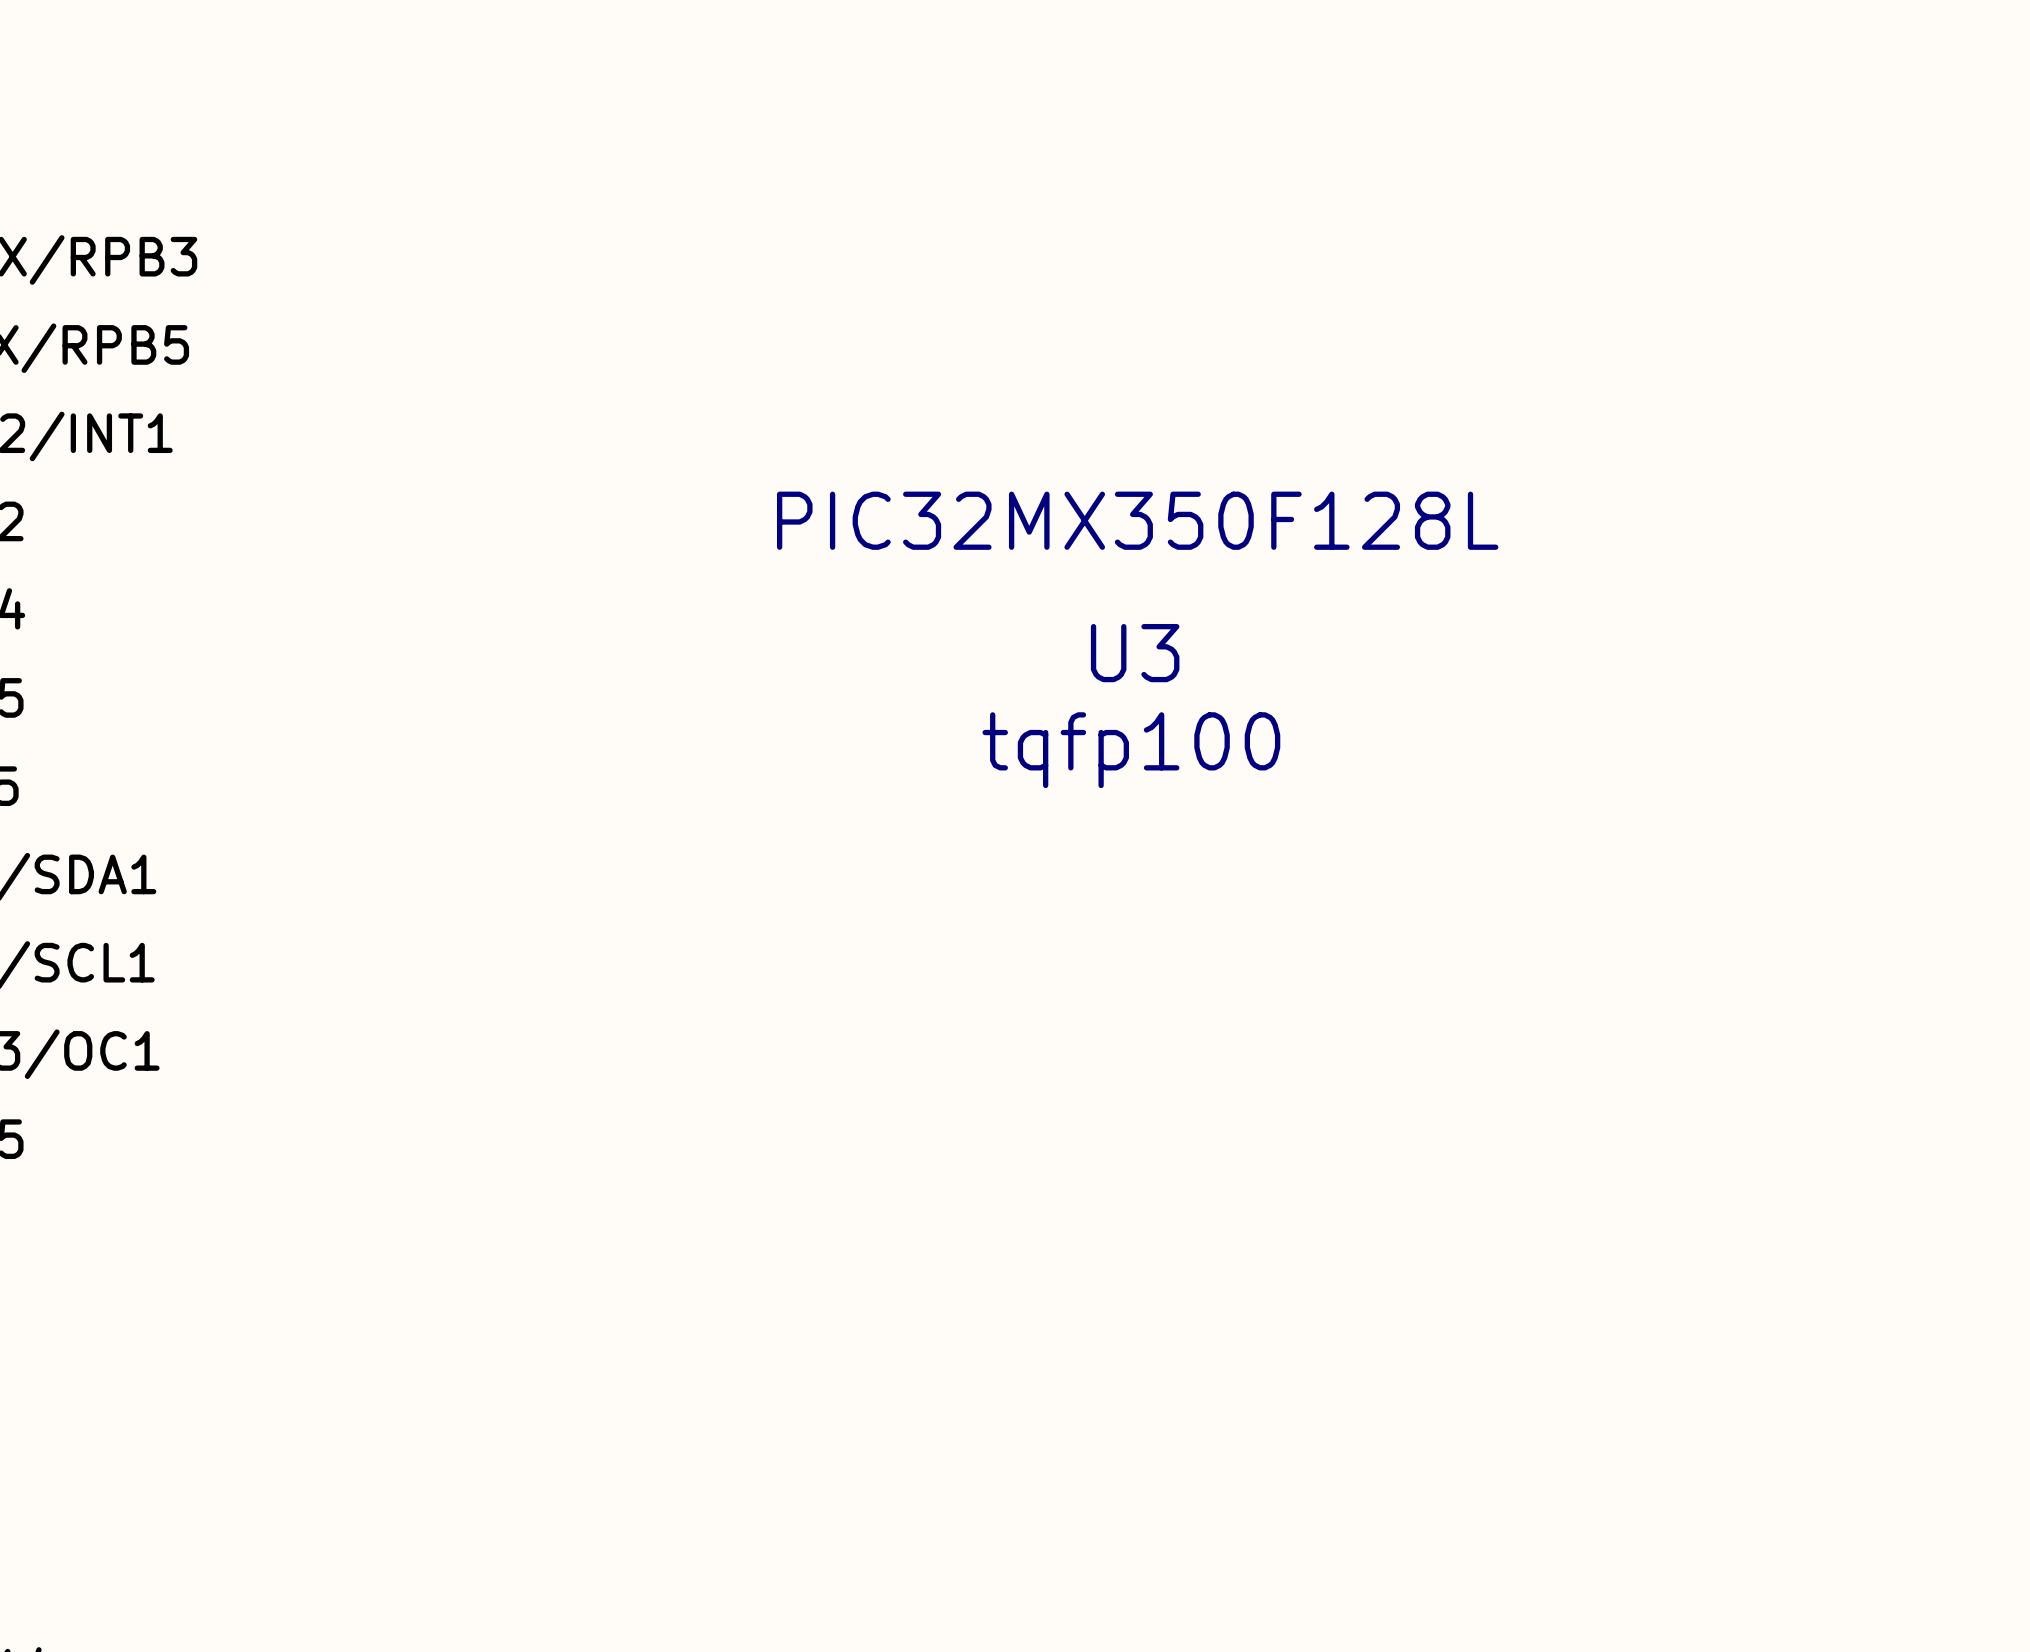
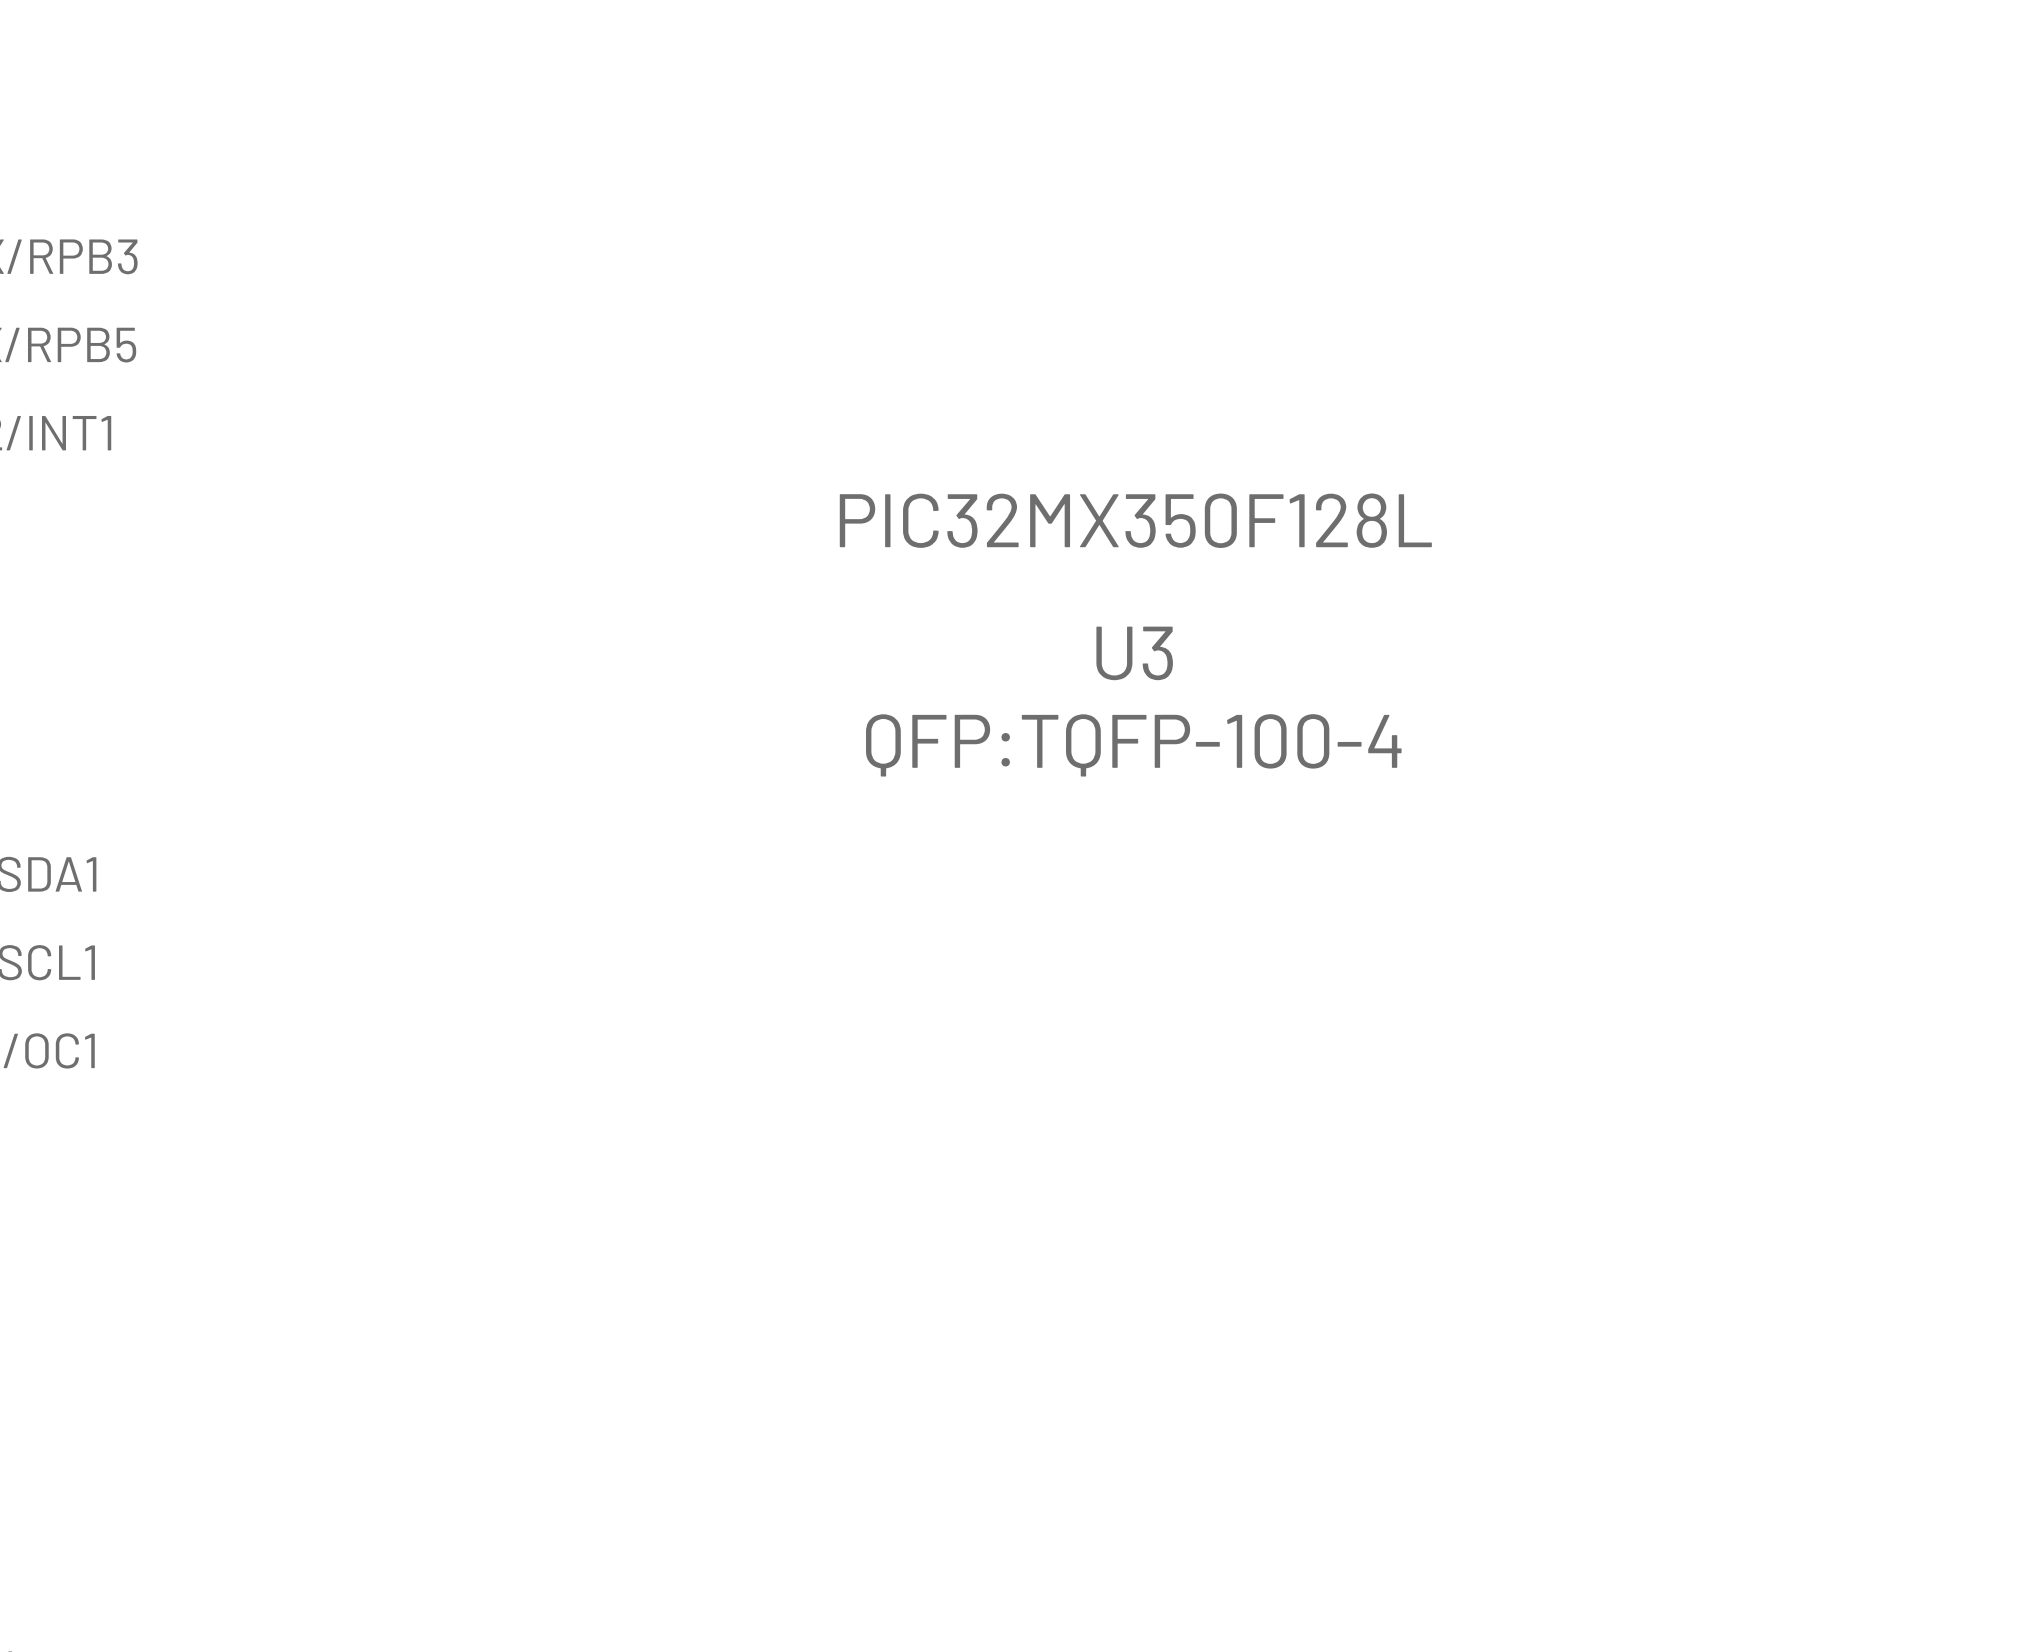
U3 text: tqfp100 (1131, 750) -> QFP:TQFP-100-4 (1133, 745)

